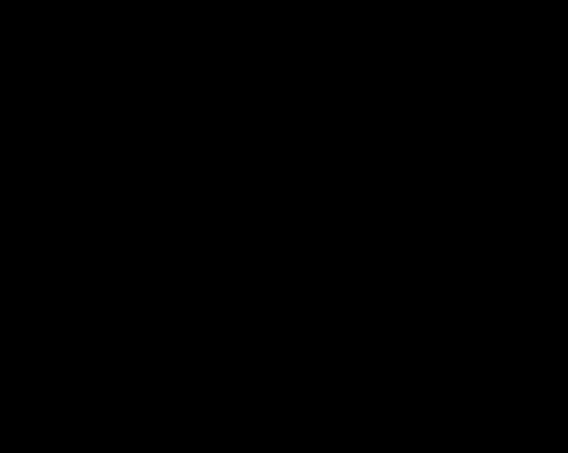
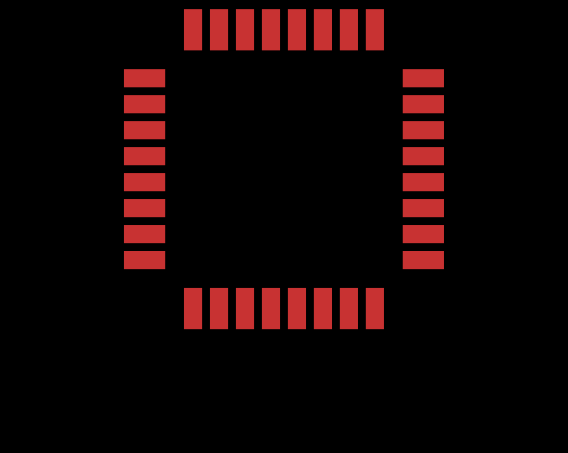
part: none -> (283, 169)

